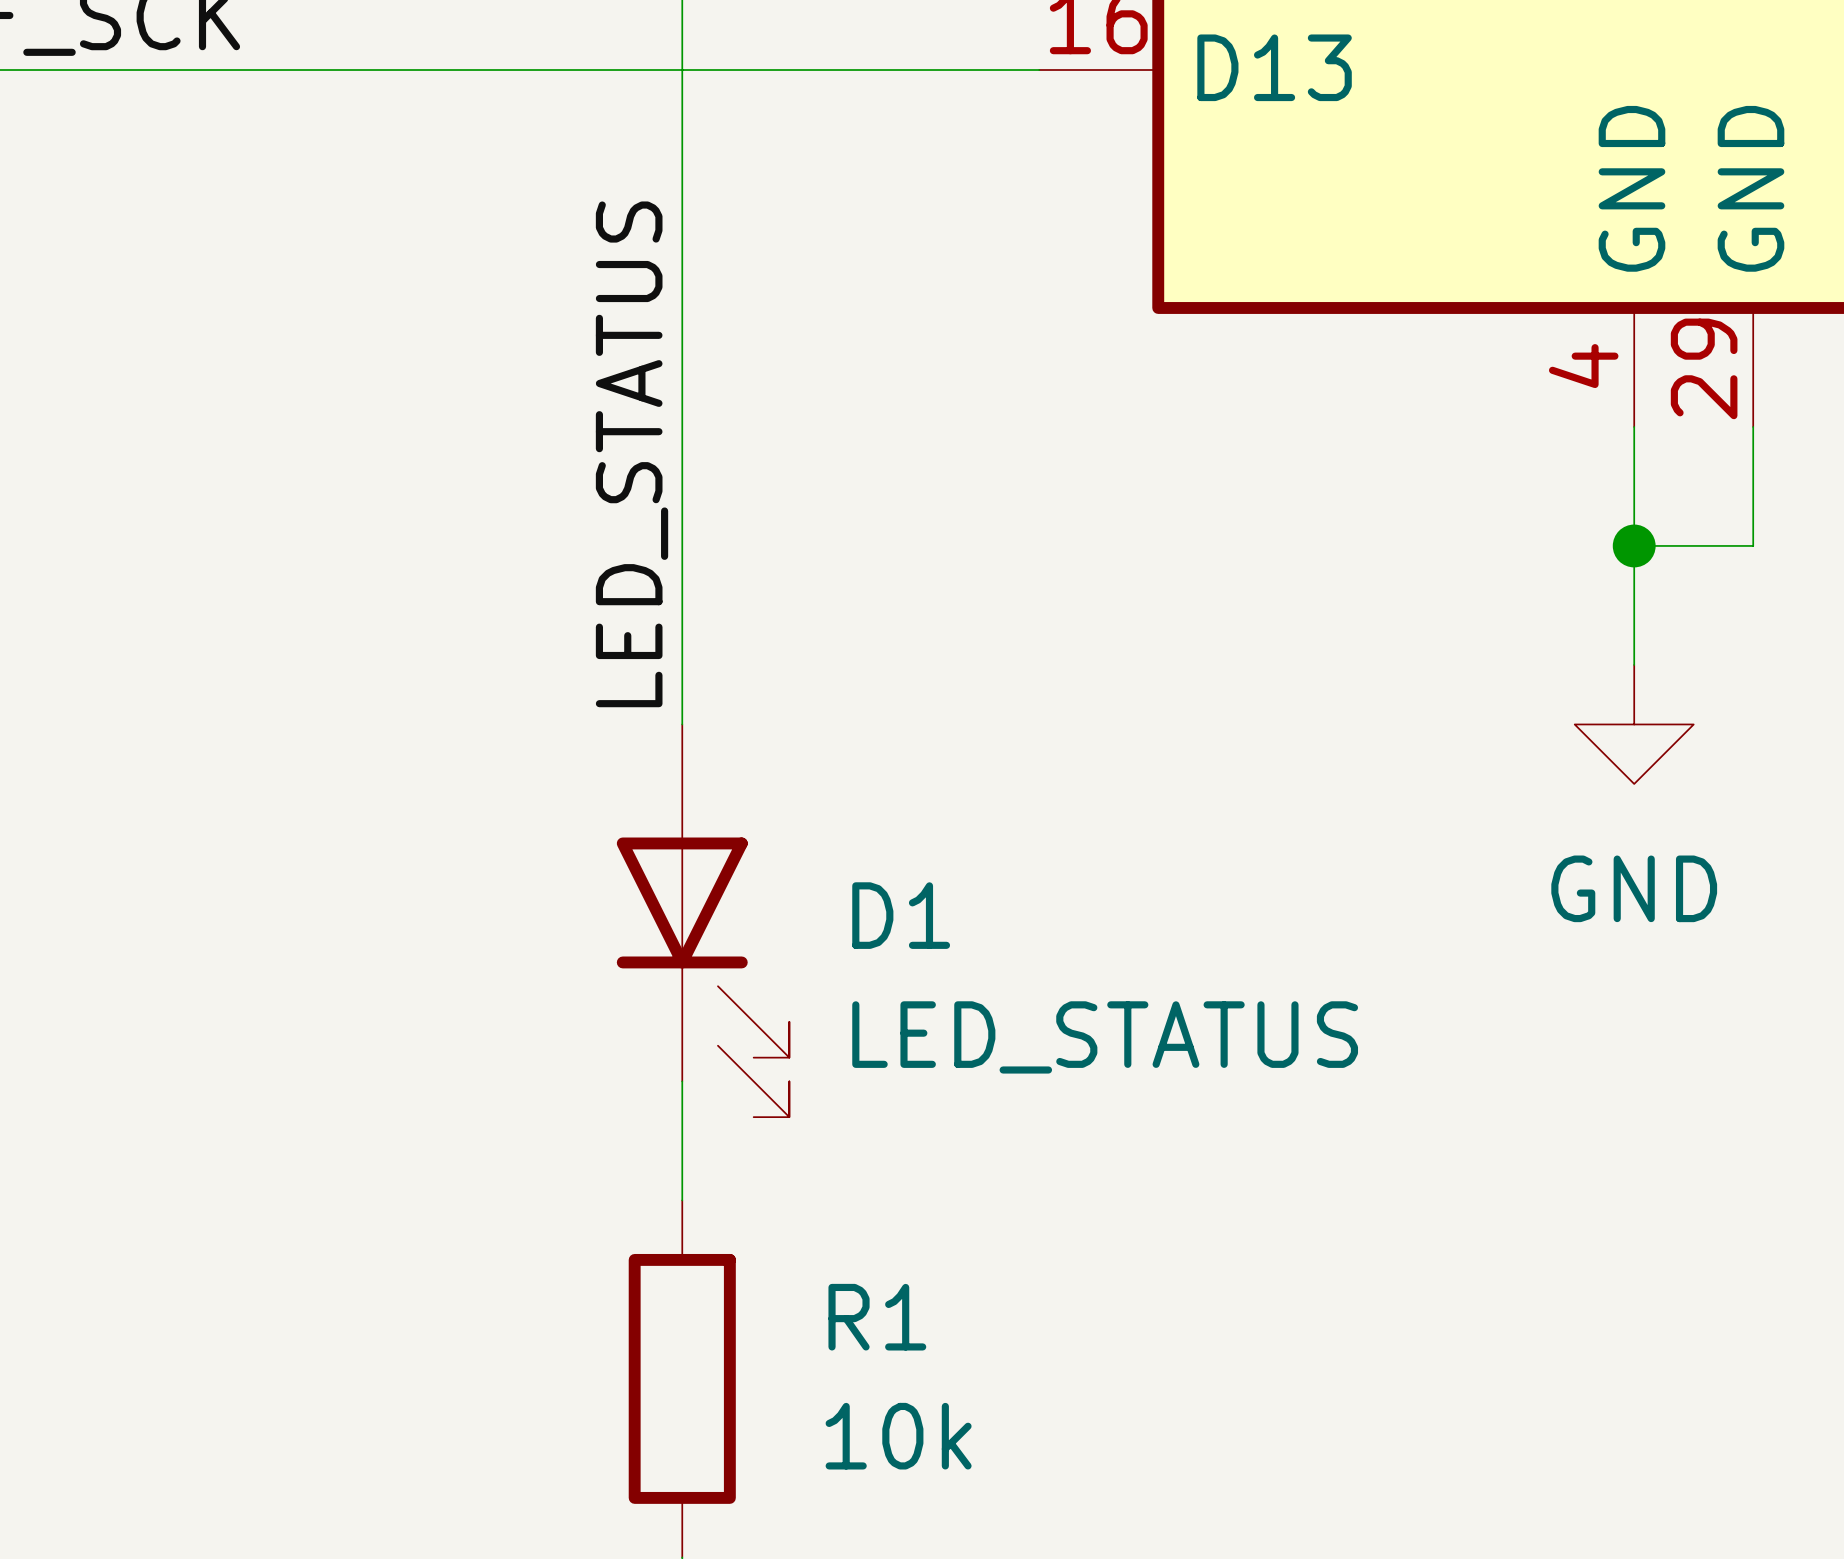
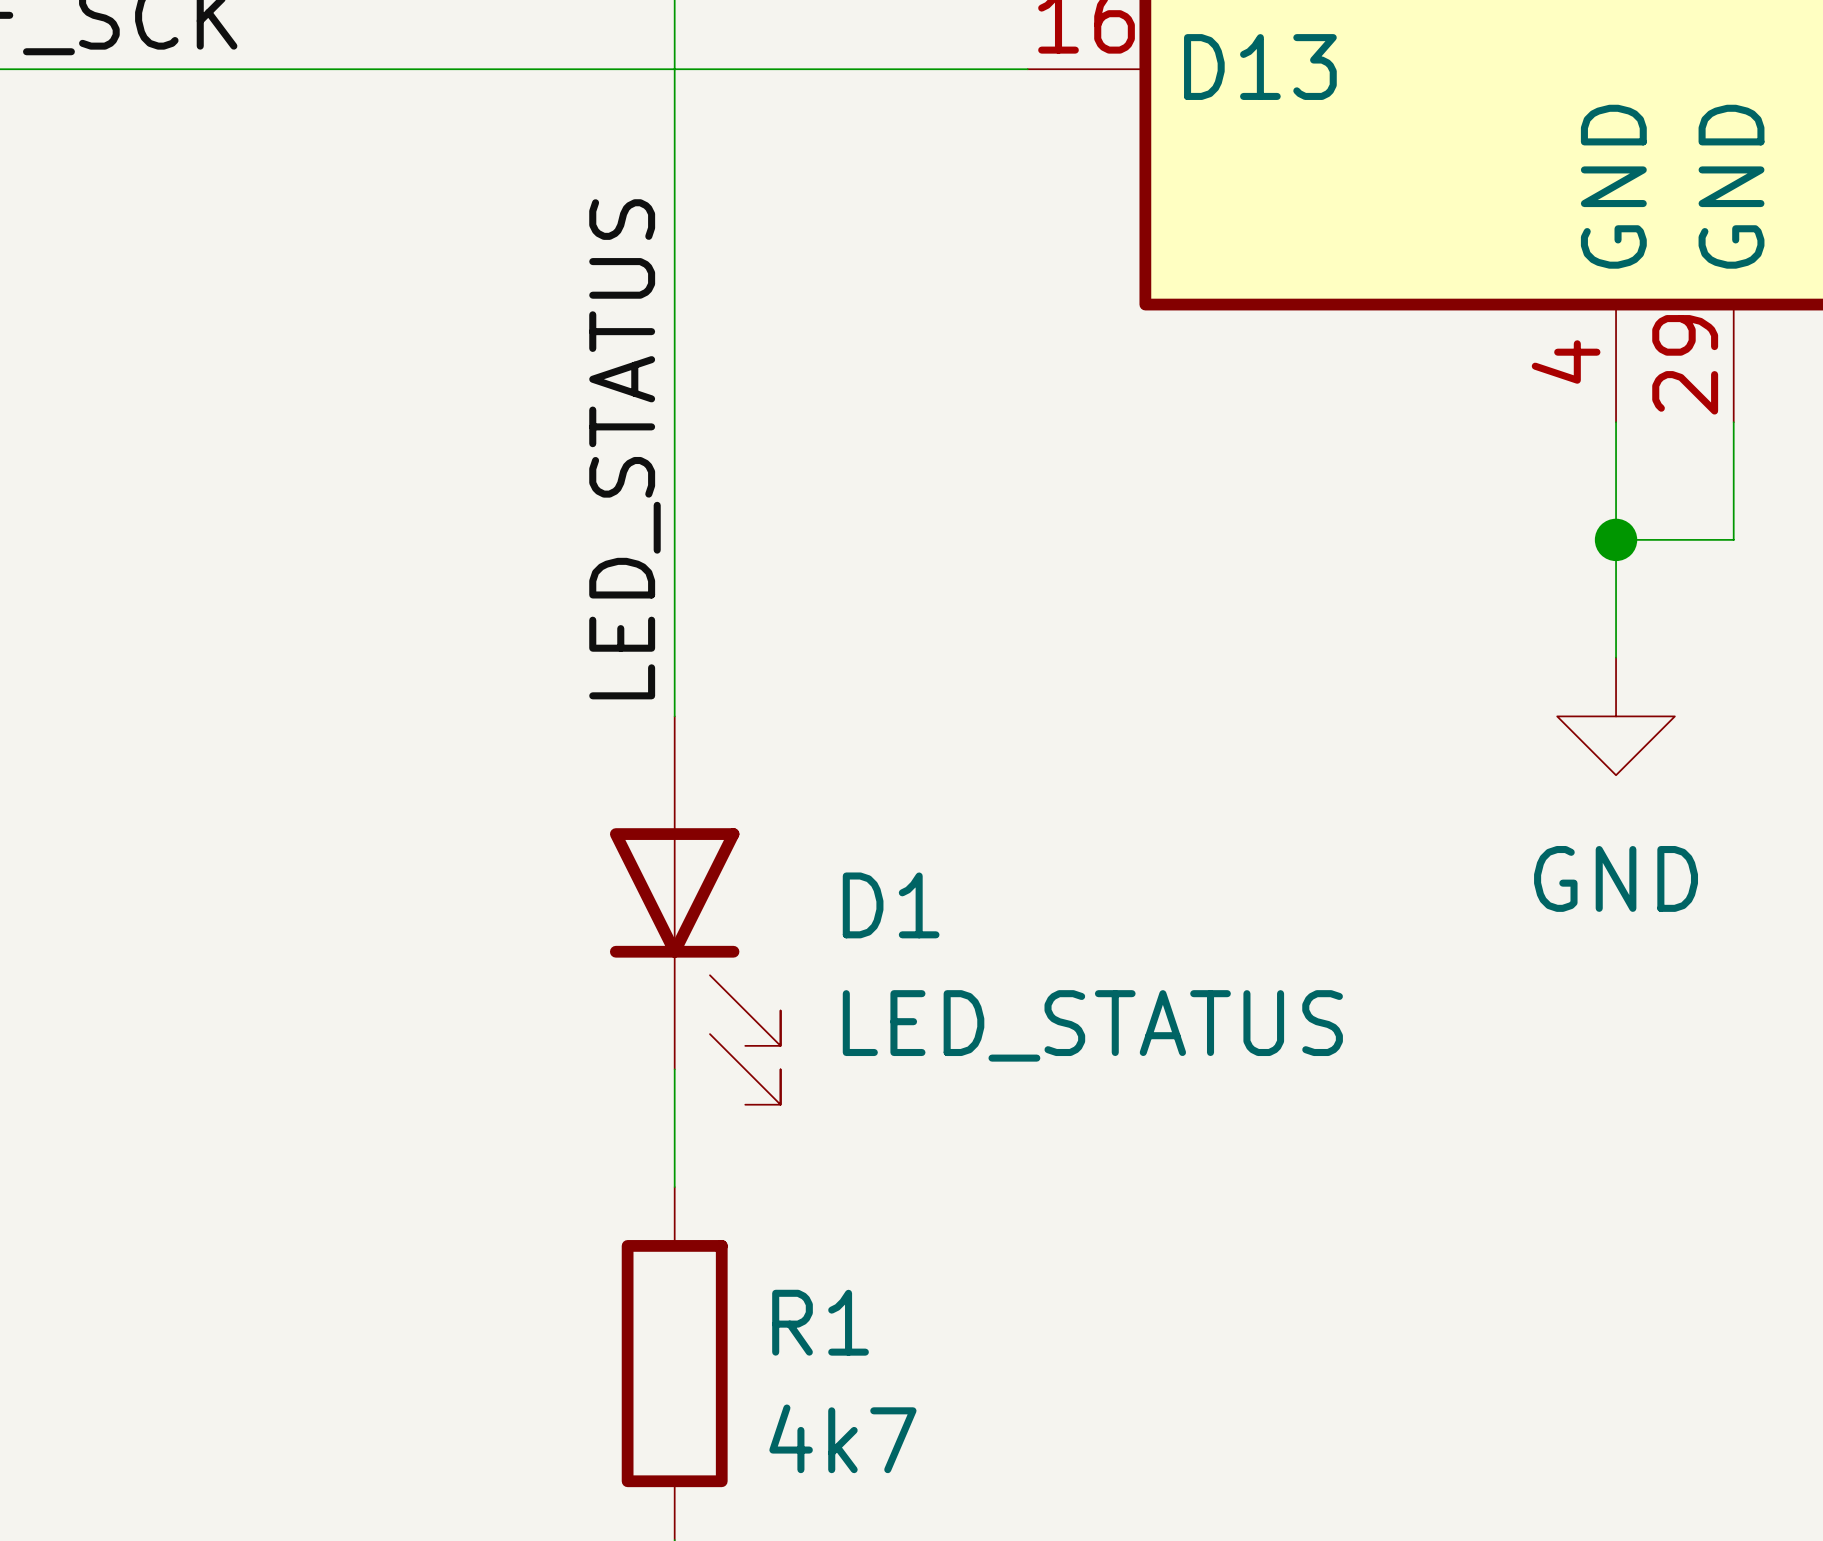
R1 name position: R1 (877, 1317) -> R1 (820, 1322)
R1 value: 10k (898, 1436) -> 4k7 (842, 1438)

